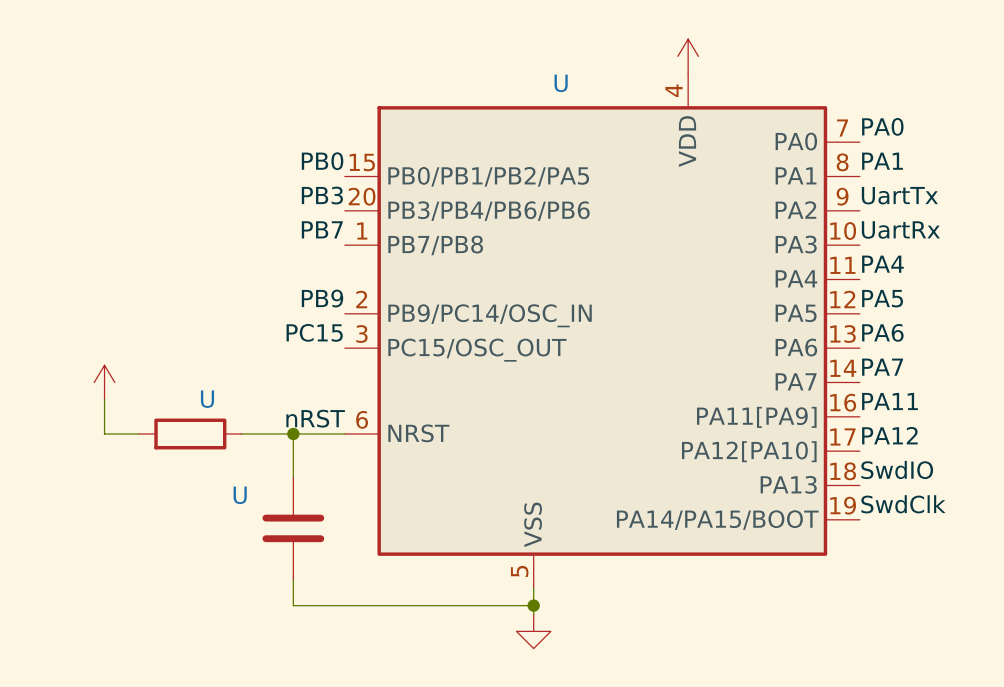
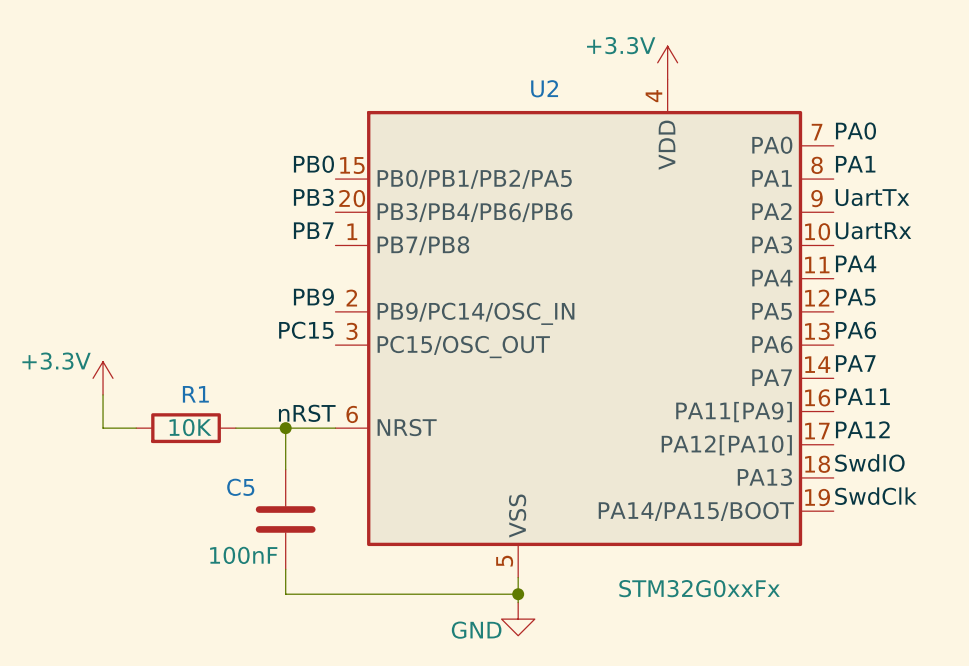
power symbol text: none -> +3.3V (621, 45)
U name: U (561, 83) -> U2 (544, 88)
power symbol text: none -> +3.3V (56, 361)
U name: U (207, 399) -> R1 (195, 394)
U value: none -> 10K (190, 427)
U name: U (240, 495) -> C5 (240, 487)
U value: none -> 100nF (243, 555)
U value: none -> STM32G0xxFx (699, 588)
power symbol text: none -> GND (476, 630)

